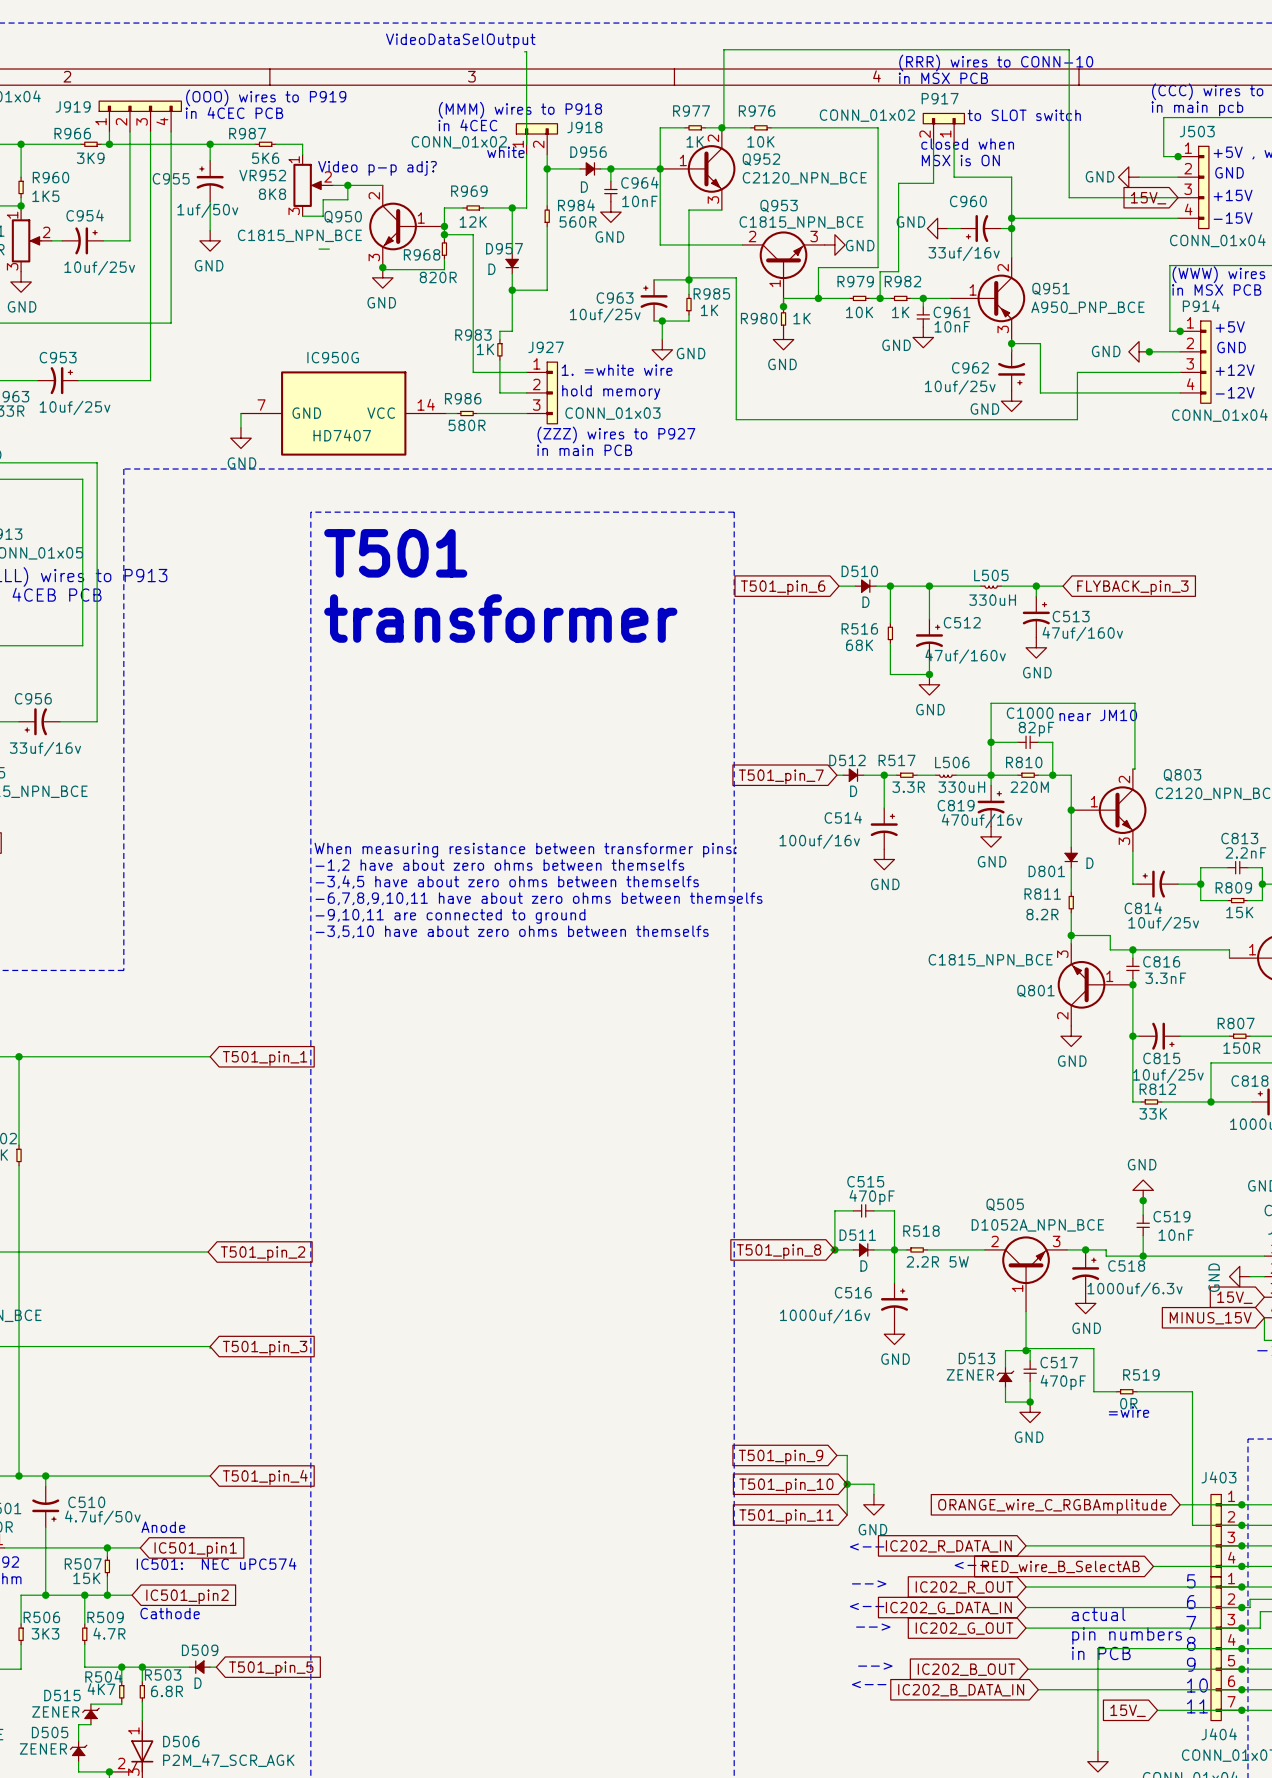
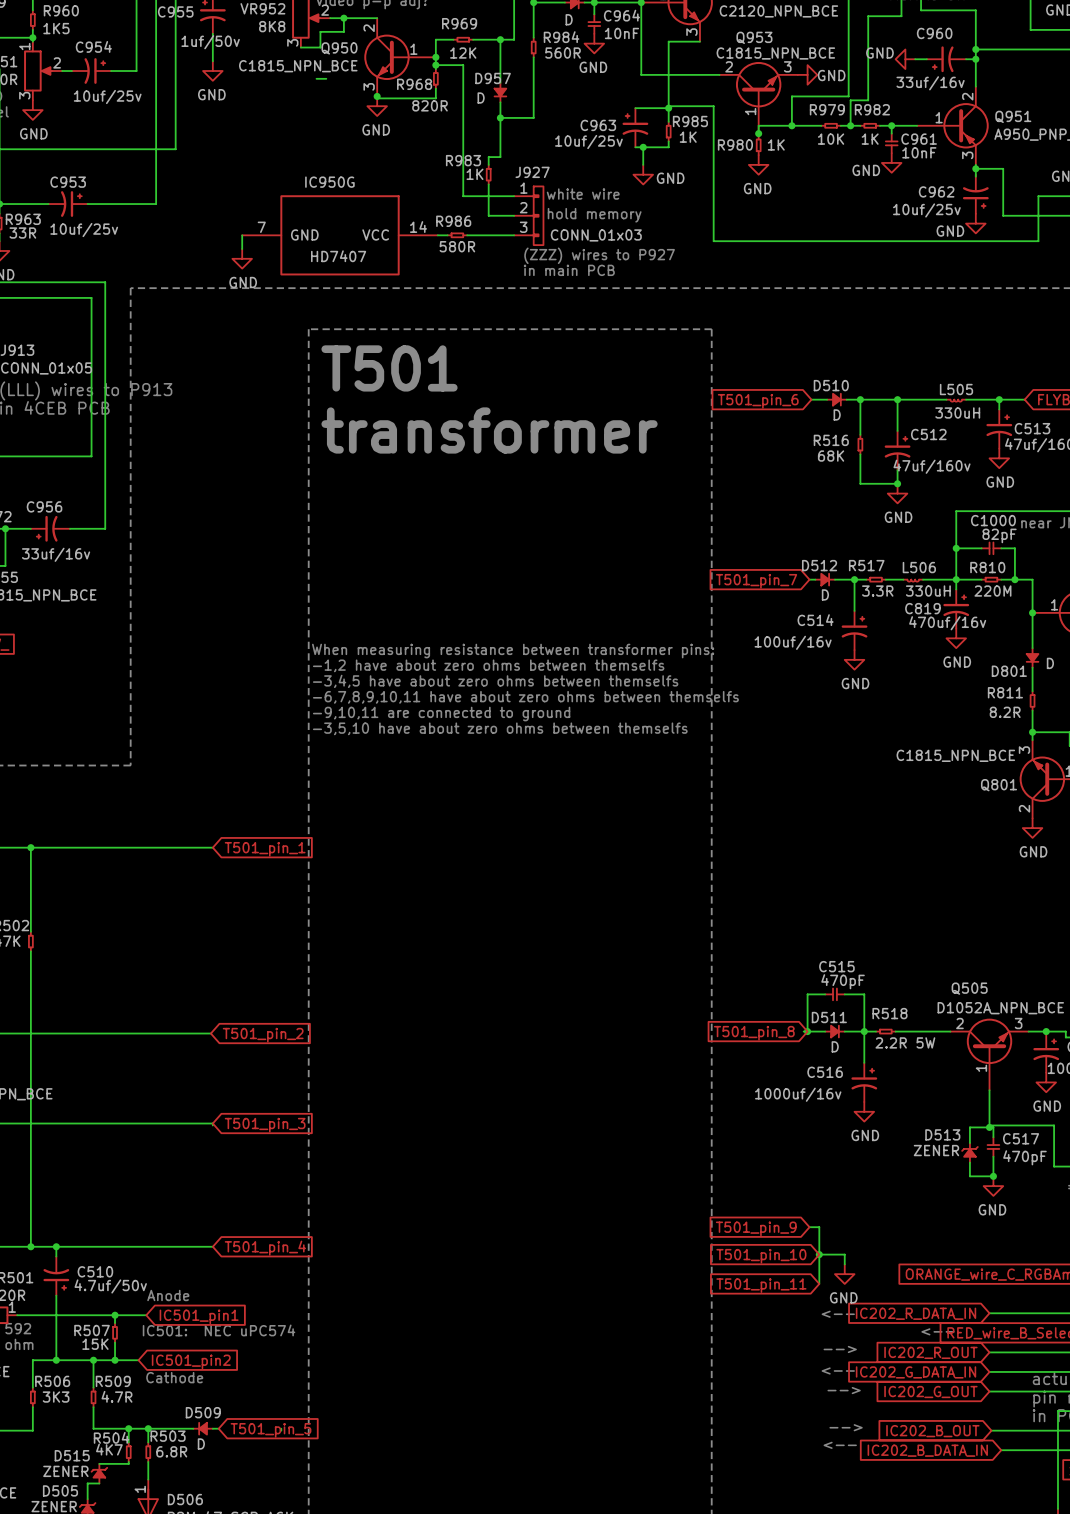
text: 1. =white wire (617, 370) -> white wire (583, 194)

